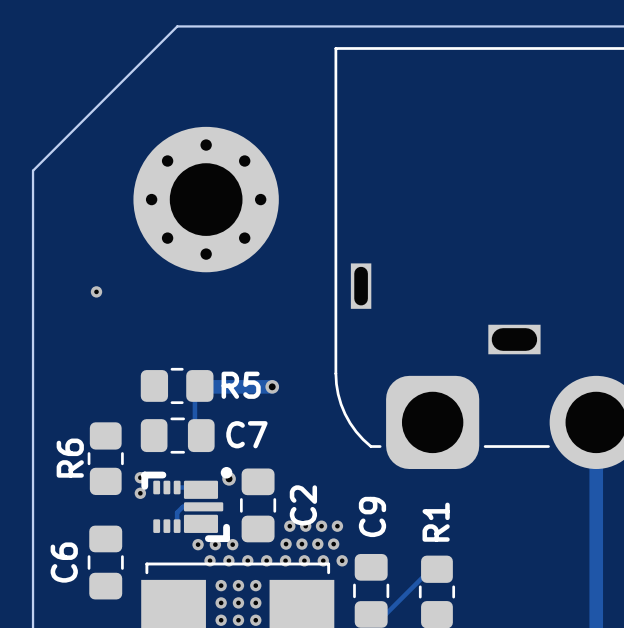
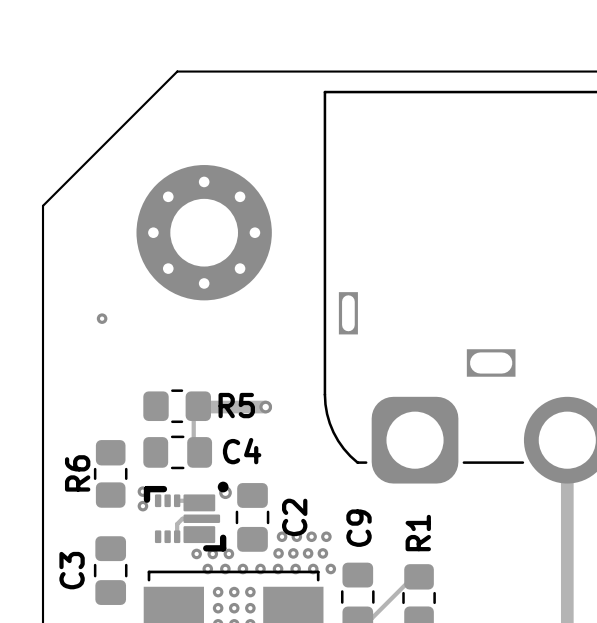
C7 name: C7 (246, 434) -> C4 (242, 451)
C6 name: C6 (64, 562) -> C3 (72, 570)

